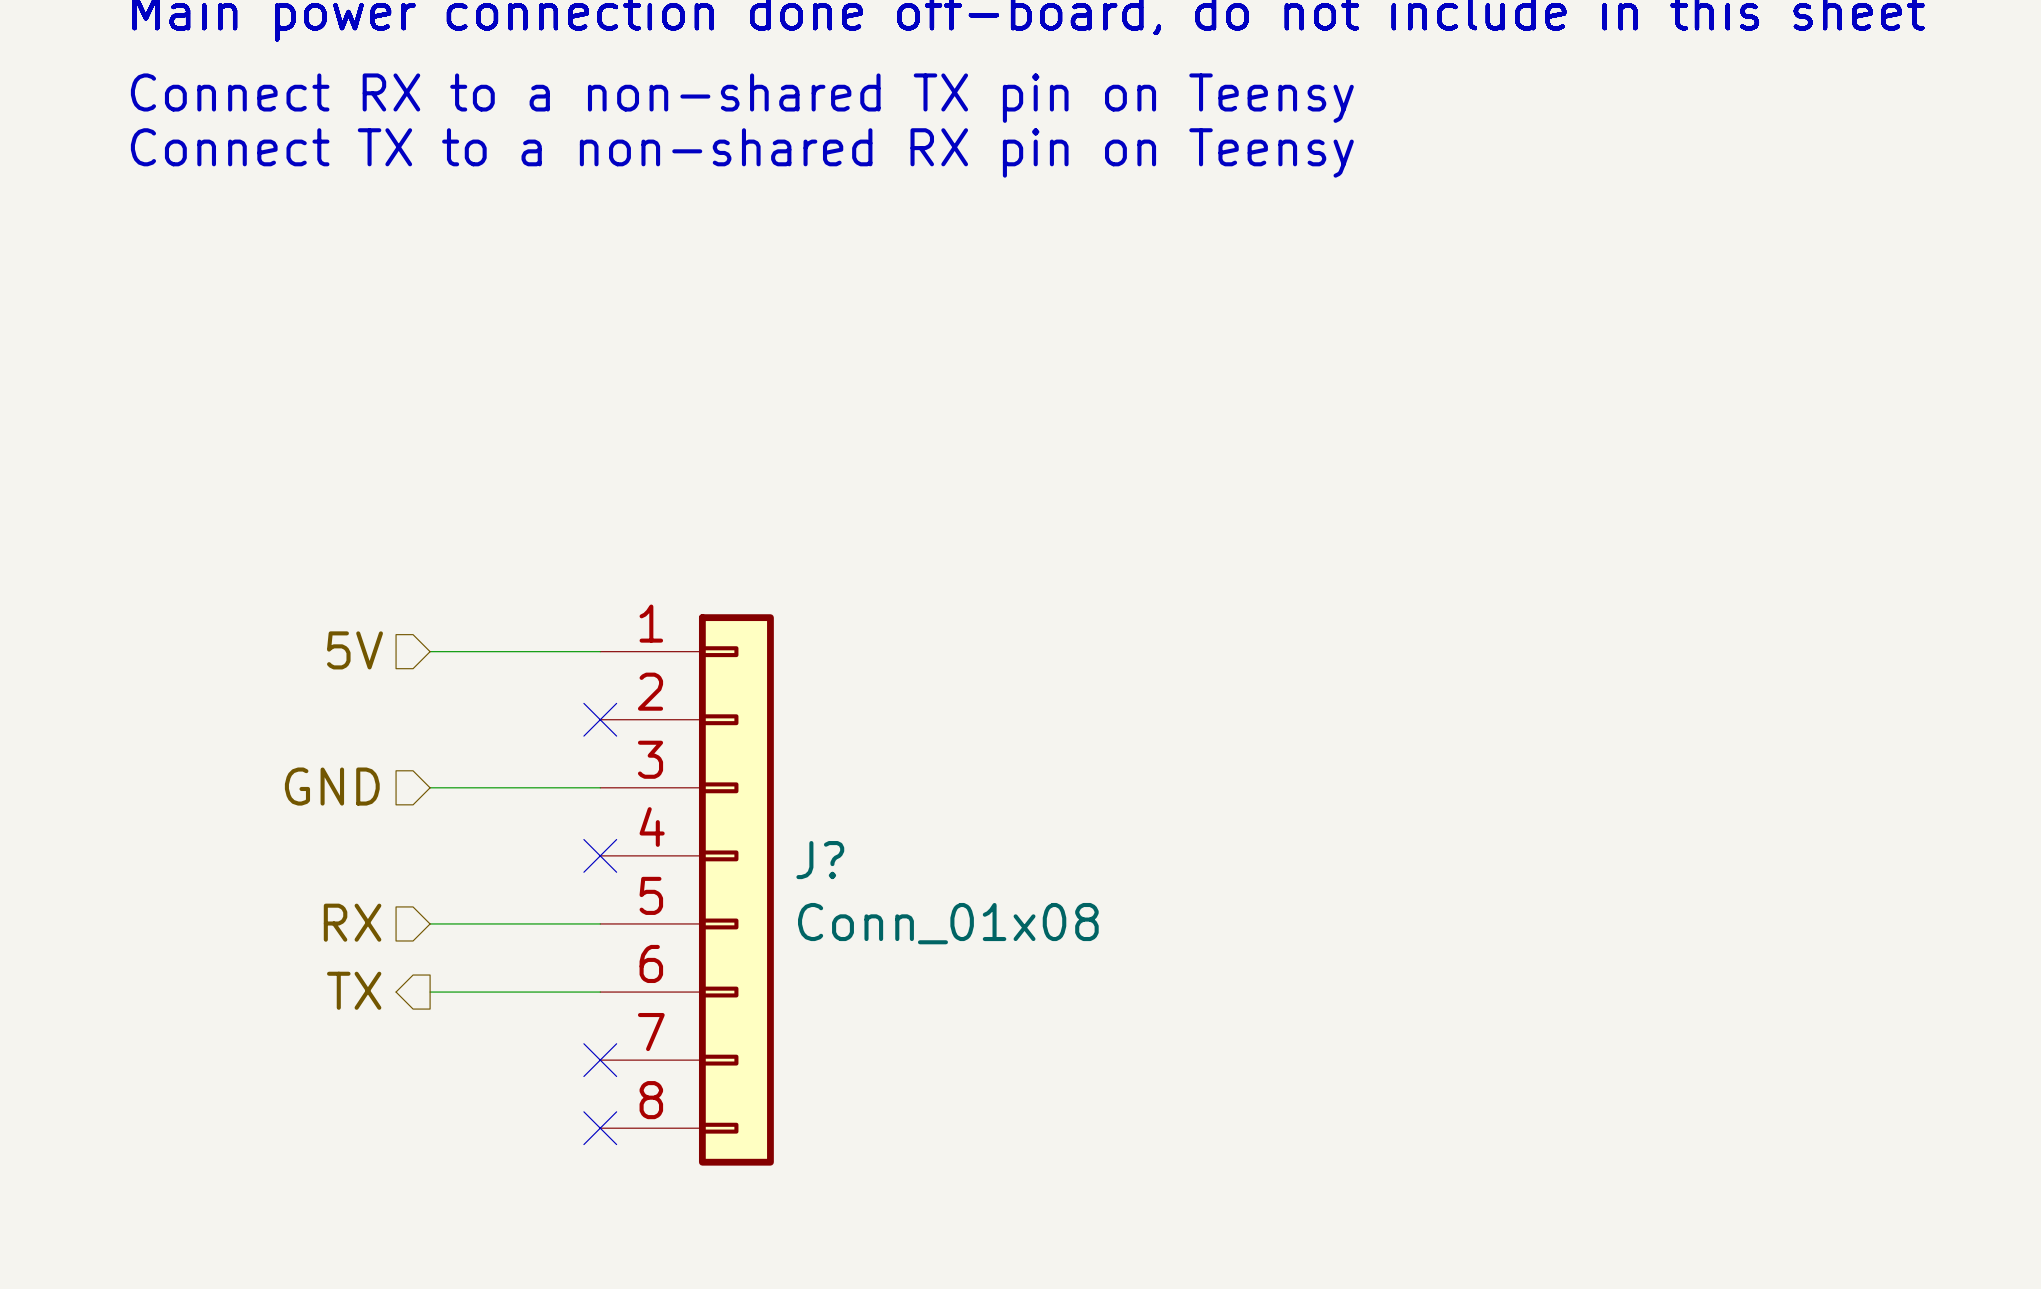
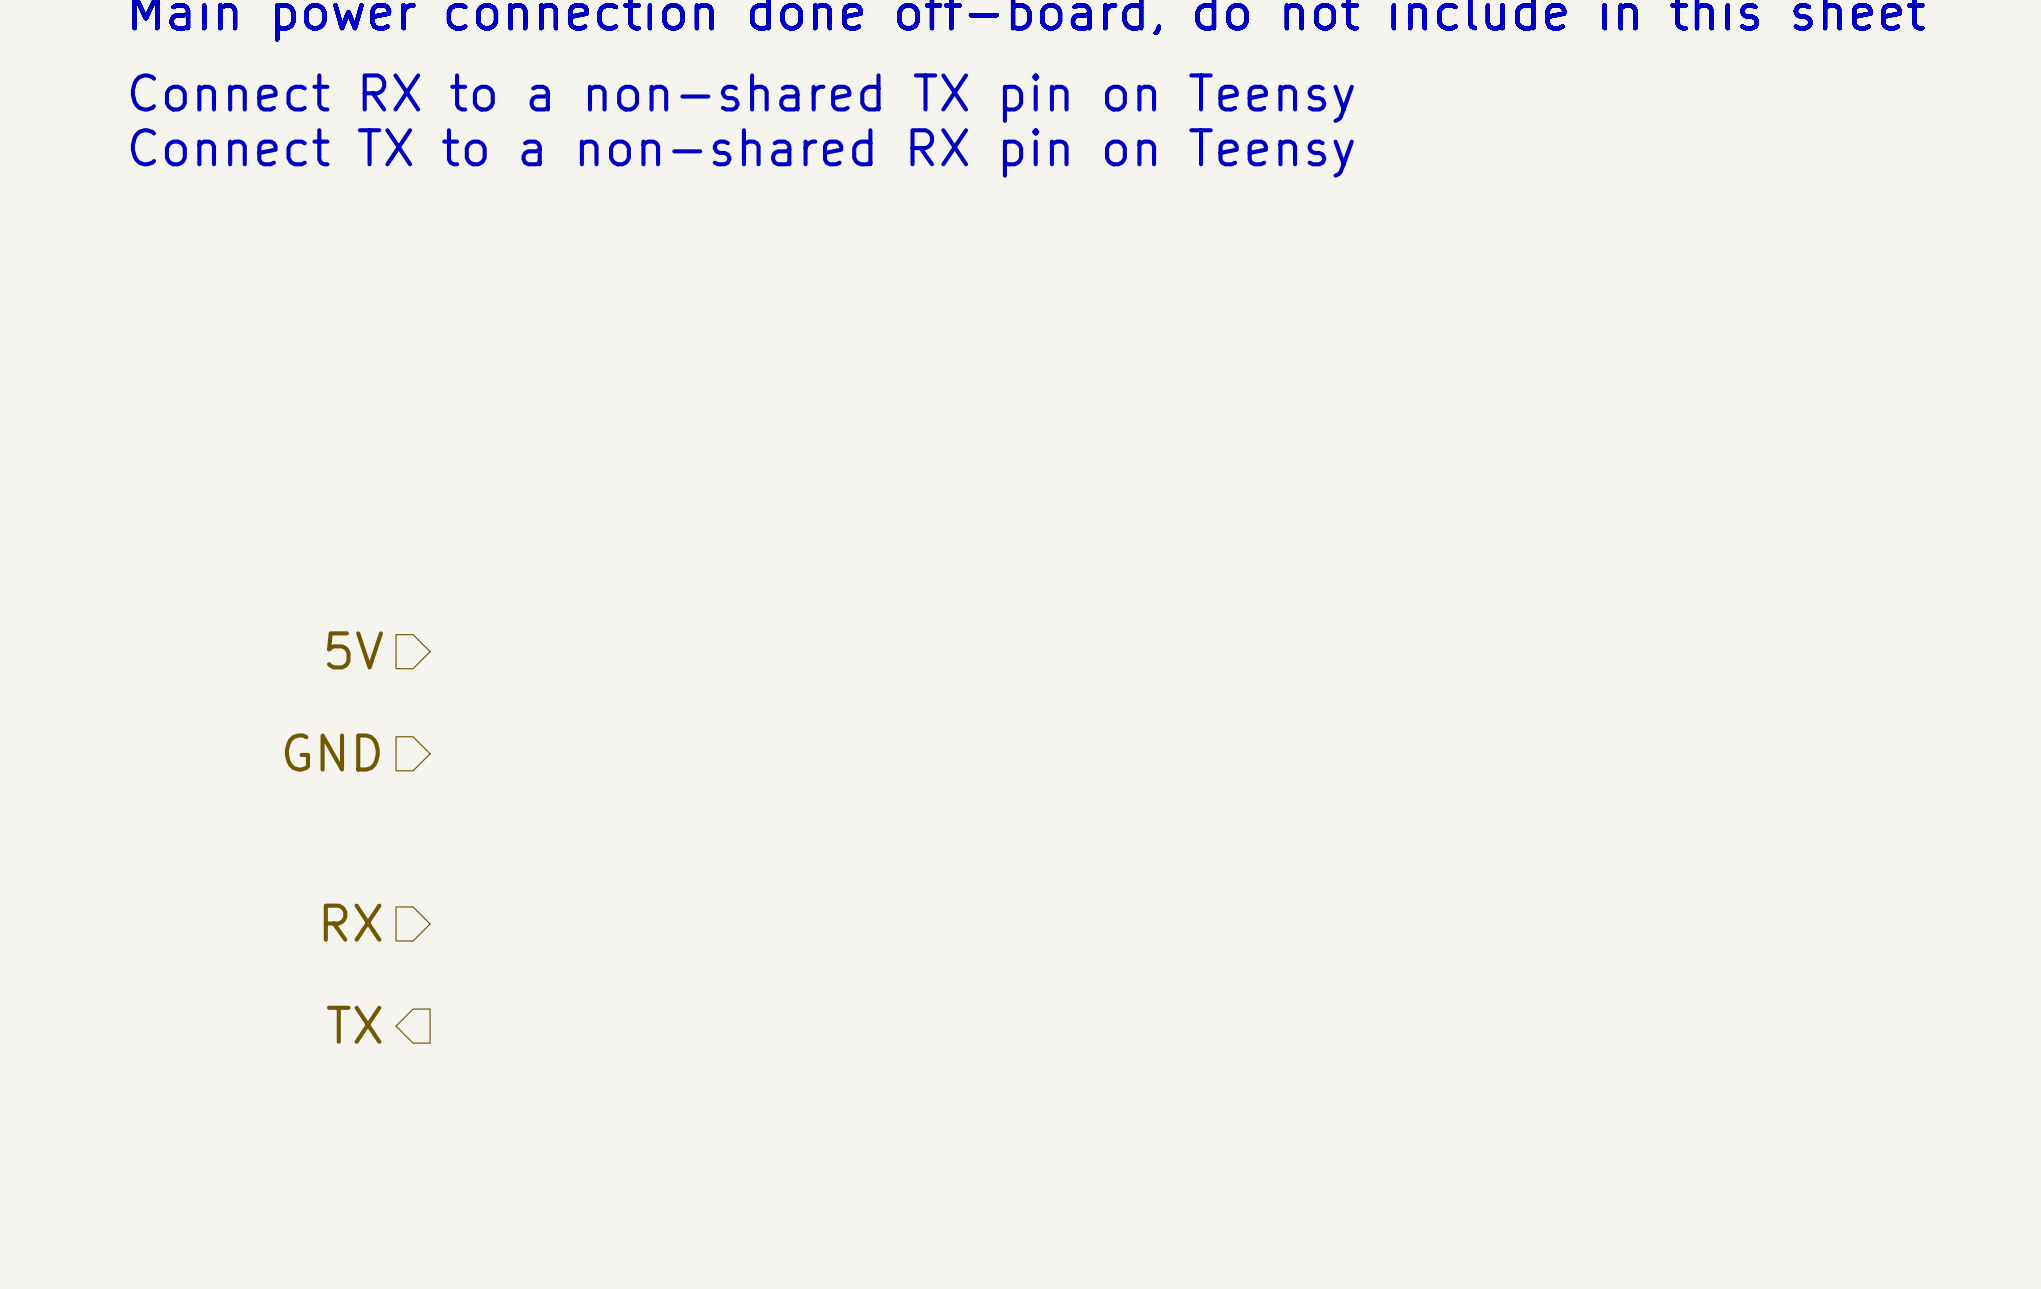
wire: (430, 651) (600, 651) -> none
no-connect mark: (600, 719) -> none
hierarchical label position: GND (332, 786) -> GND (332, 752)
wire: (430, 787) (600, 787) -> none
no-connect mark: (600, 855) -> none
J?: Conn_01x08 (687, 889) -> none
wire: (430, 923) (600, 923) -> none
hierarchical label position: TX (354, 990) -> TX (354, 1024)
wire: (430, 992) (600, 992) -> none
no-connect mark: (600, 1060) -> none
no-connect mark: (600, 1128) -> none

